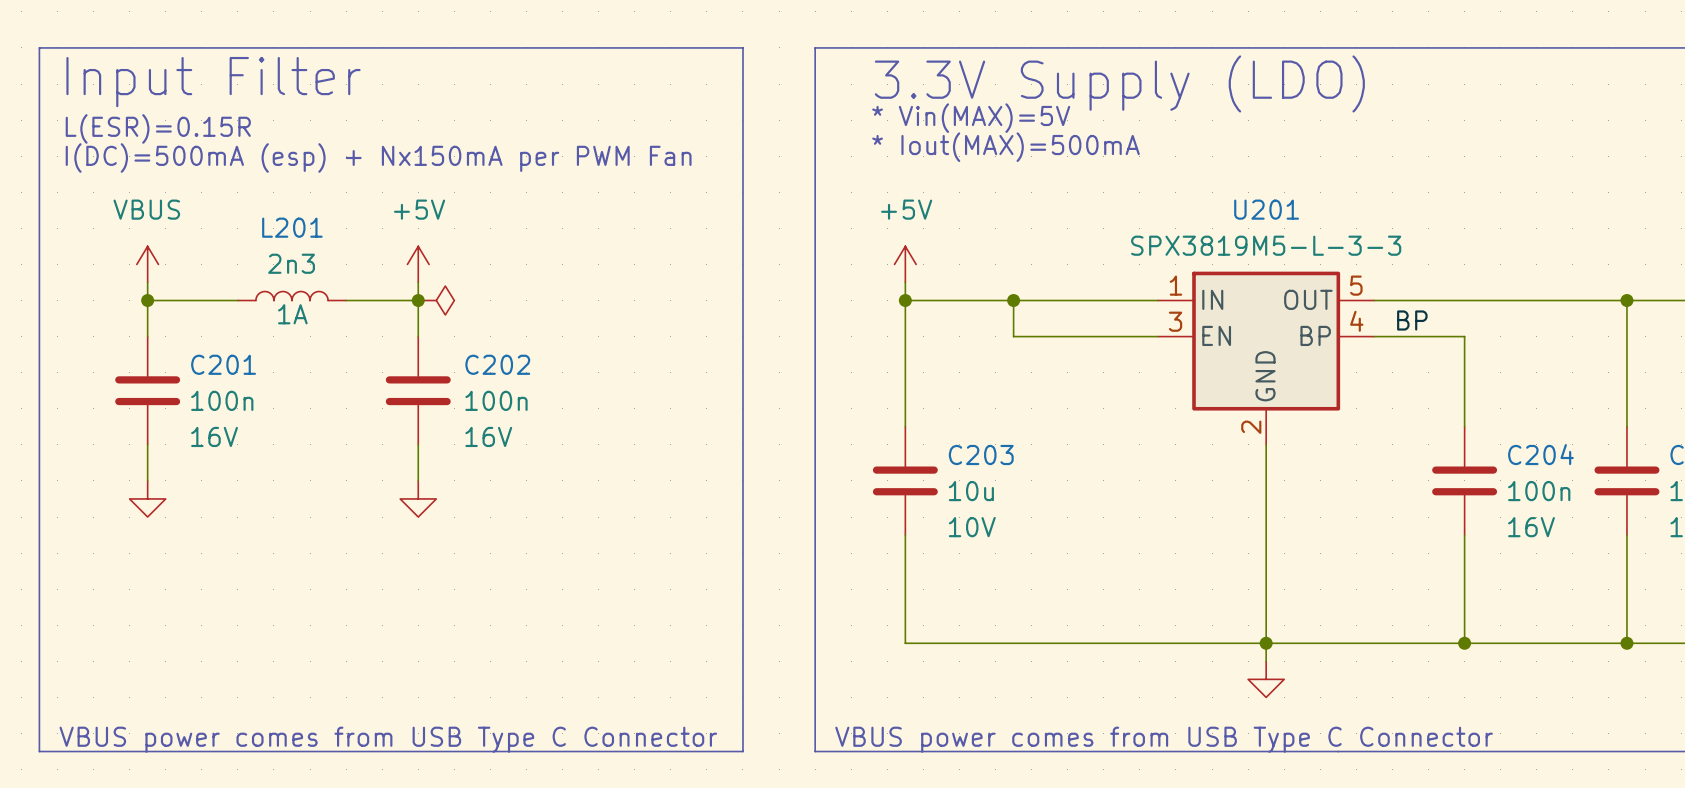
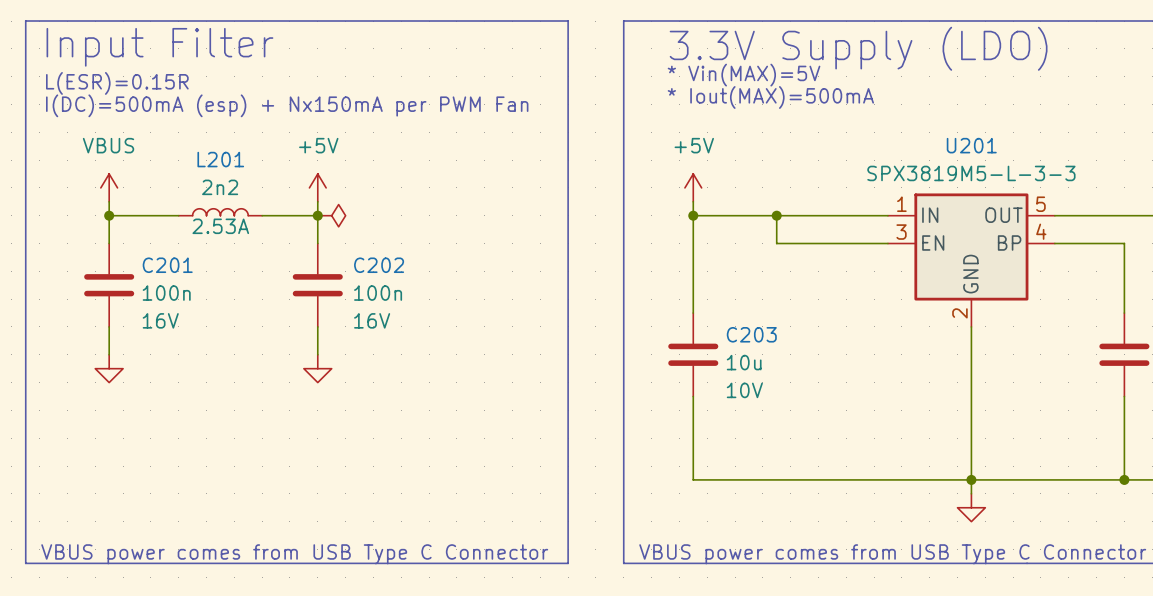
L201 value: 2n3 (291, 263) -> 2n2 (220, 187)
L201 text: 1A (292, 314) -> 2.53A (220, 226)
label: BP (1412, 320) -> none

